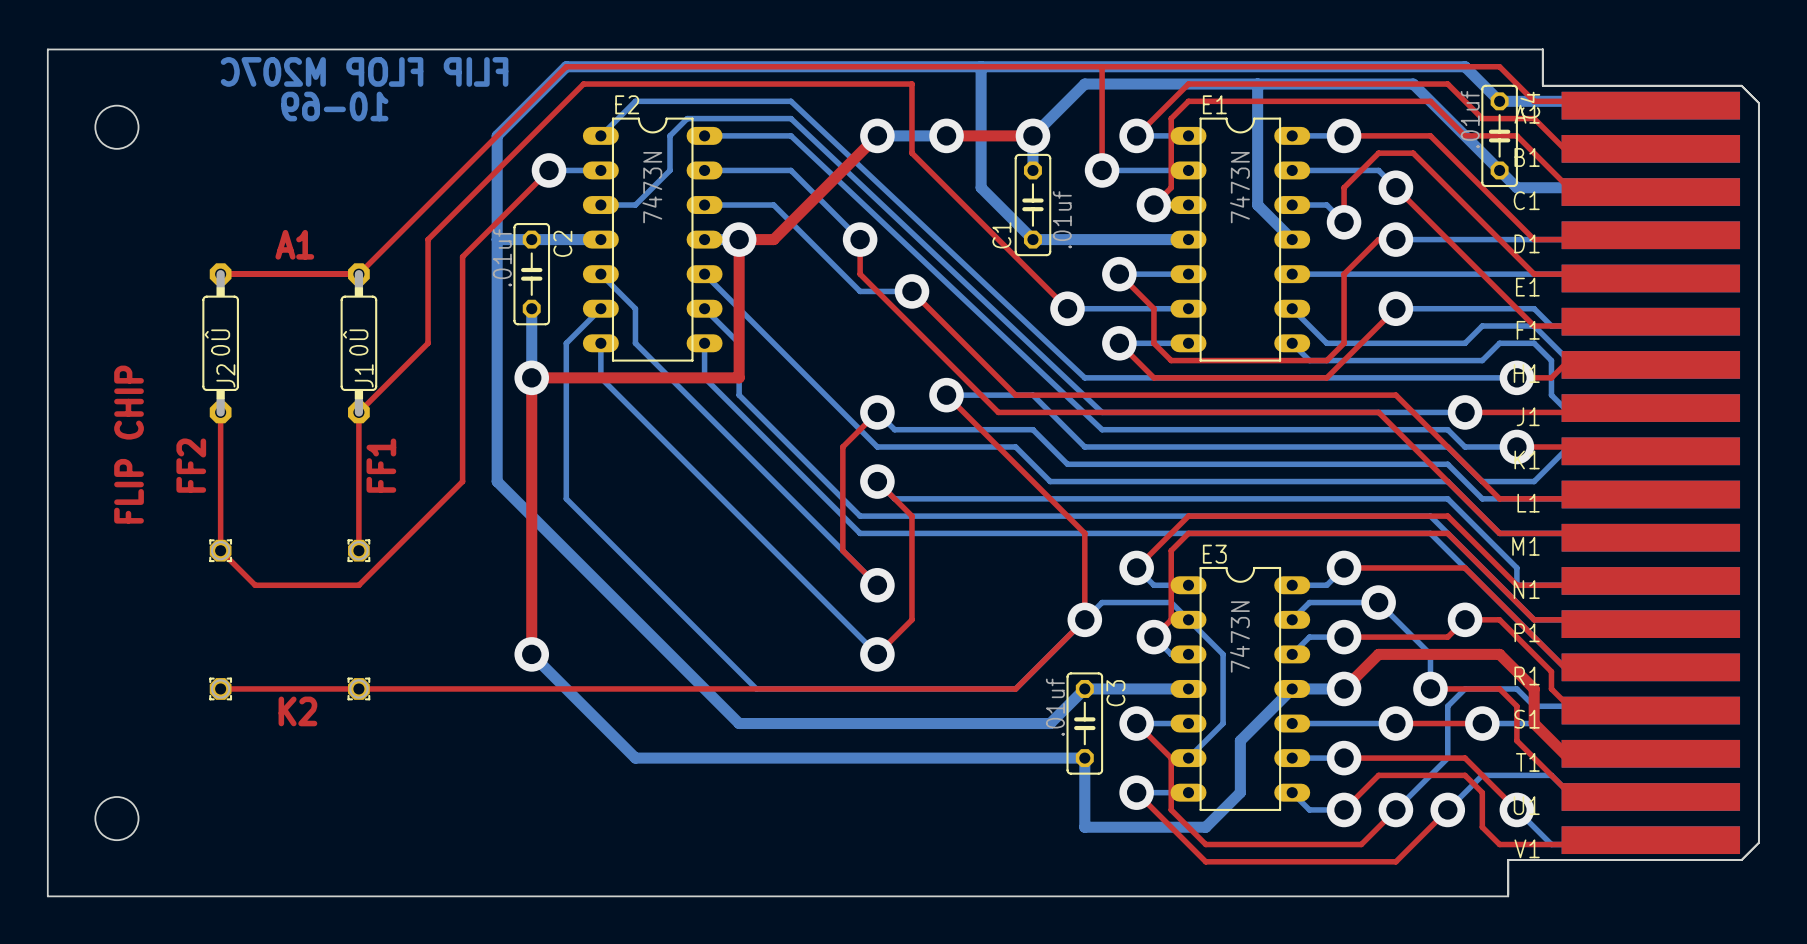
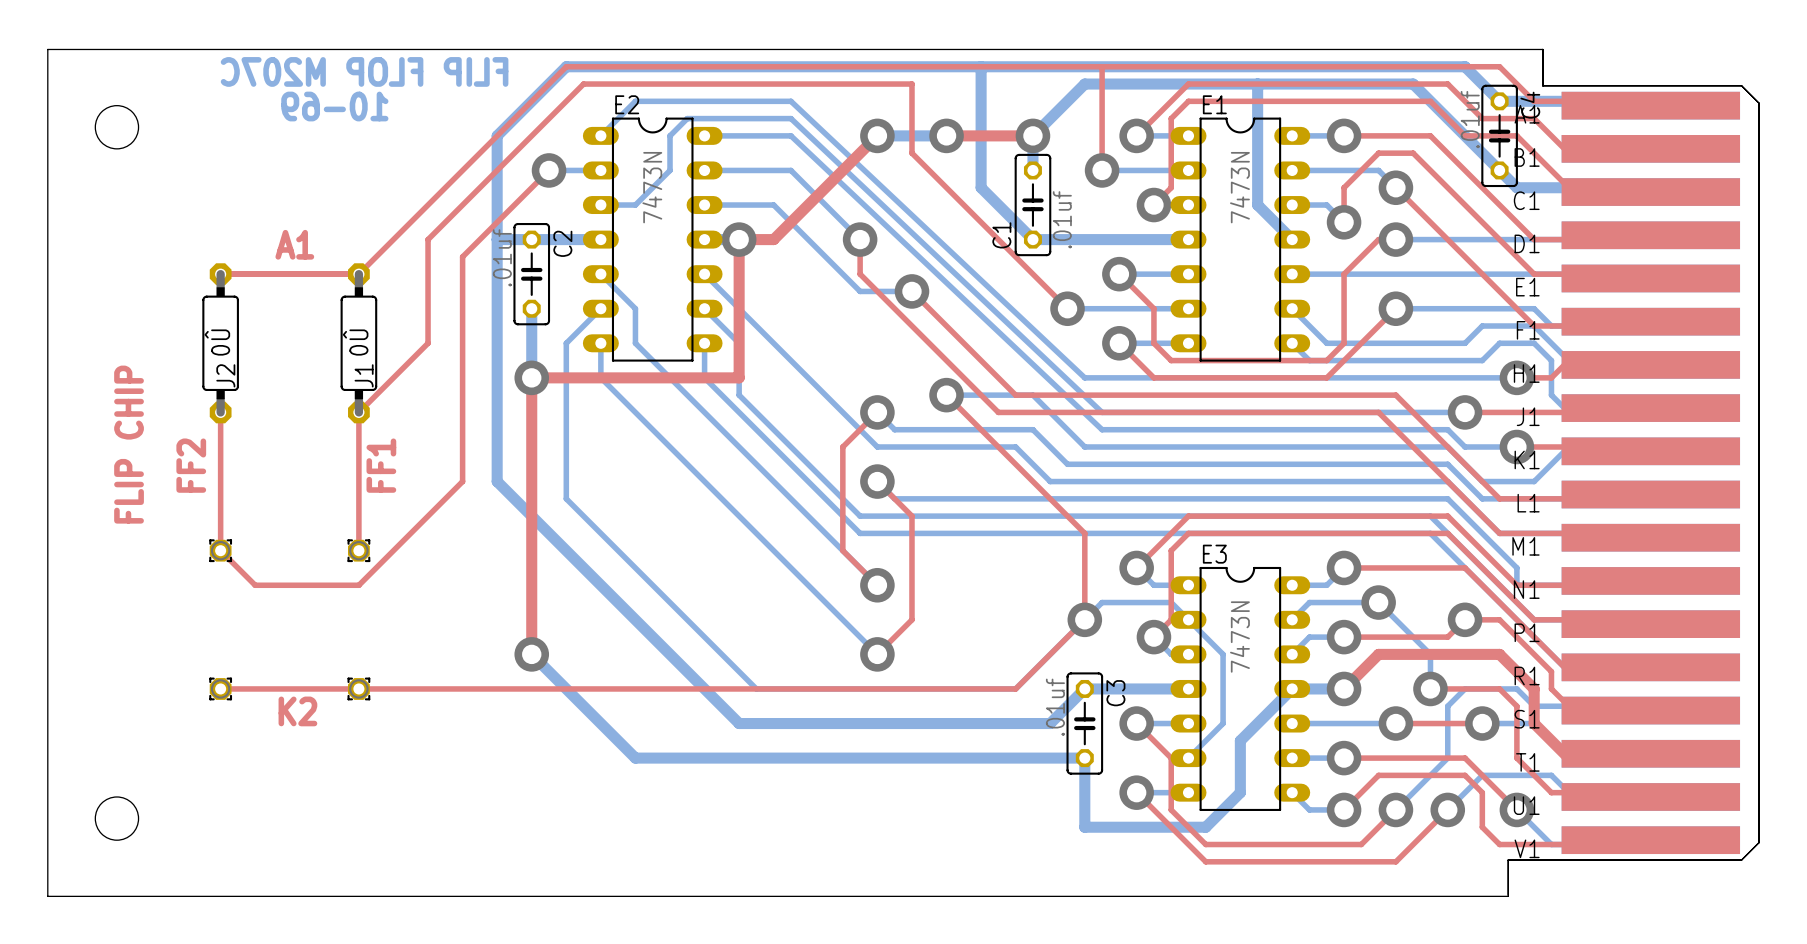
top track: (1516, 740) (1568, 792) -> (1516, 740) (1516, 758) (1551, 792) (1568, 792)

